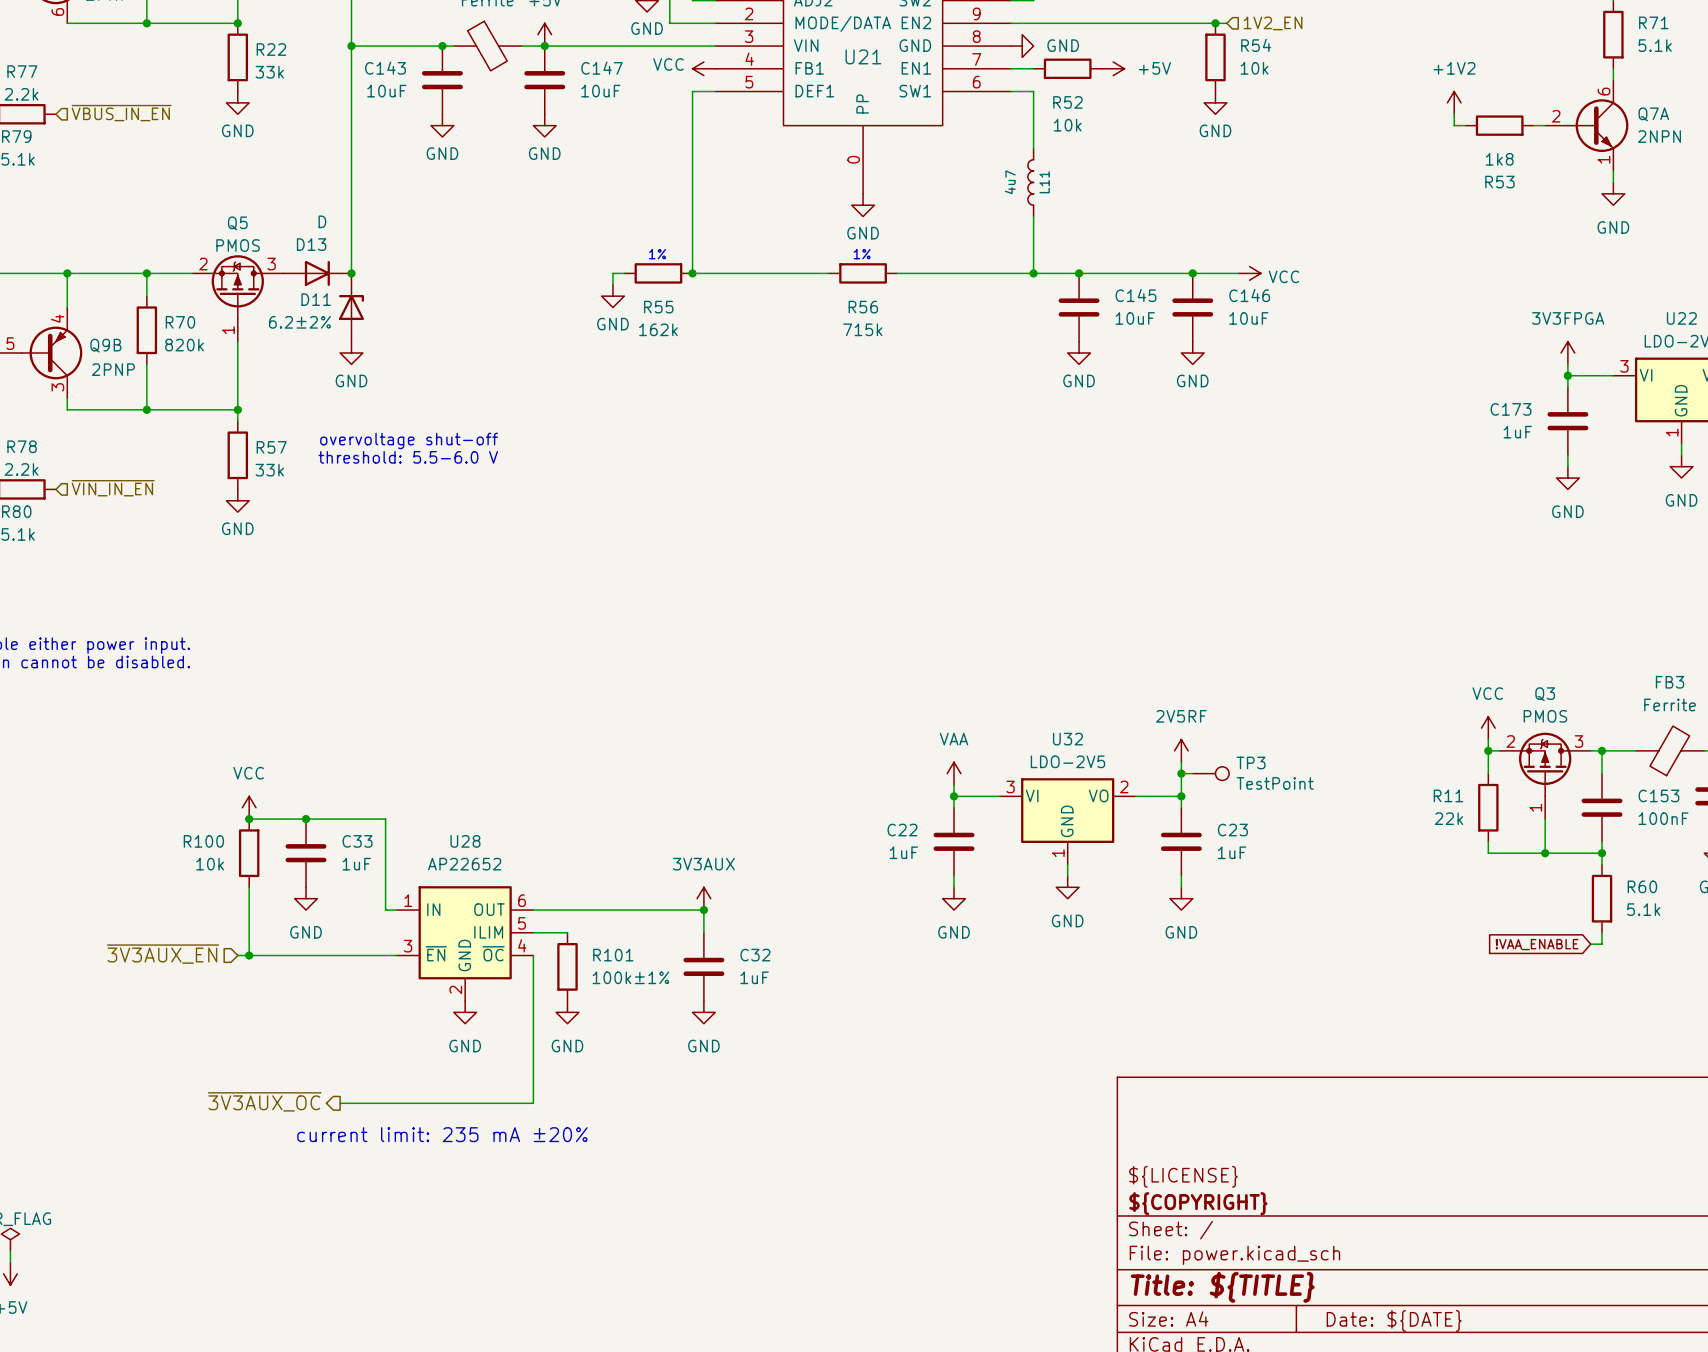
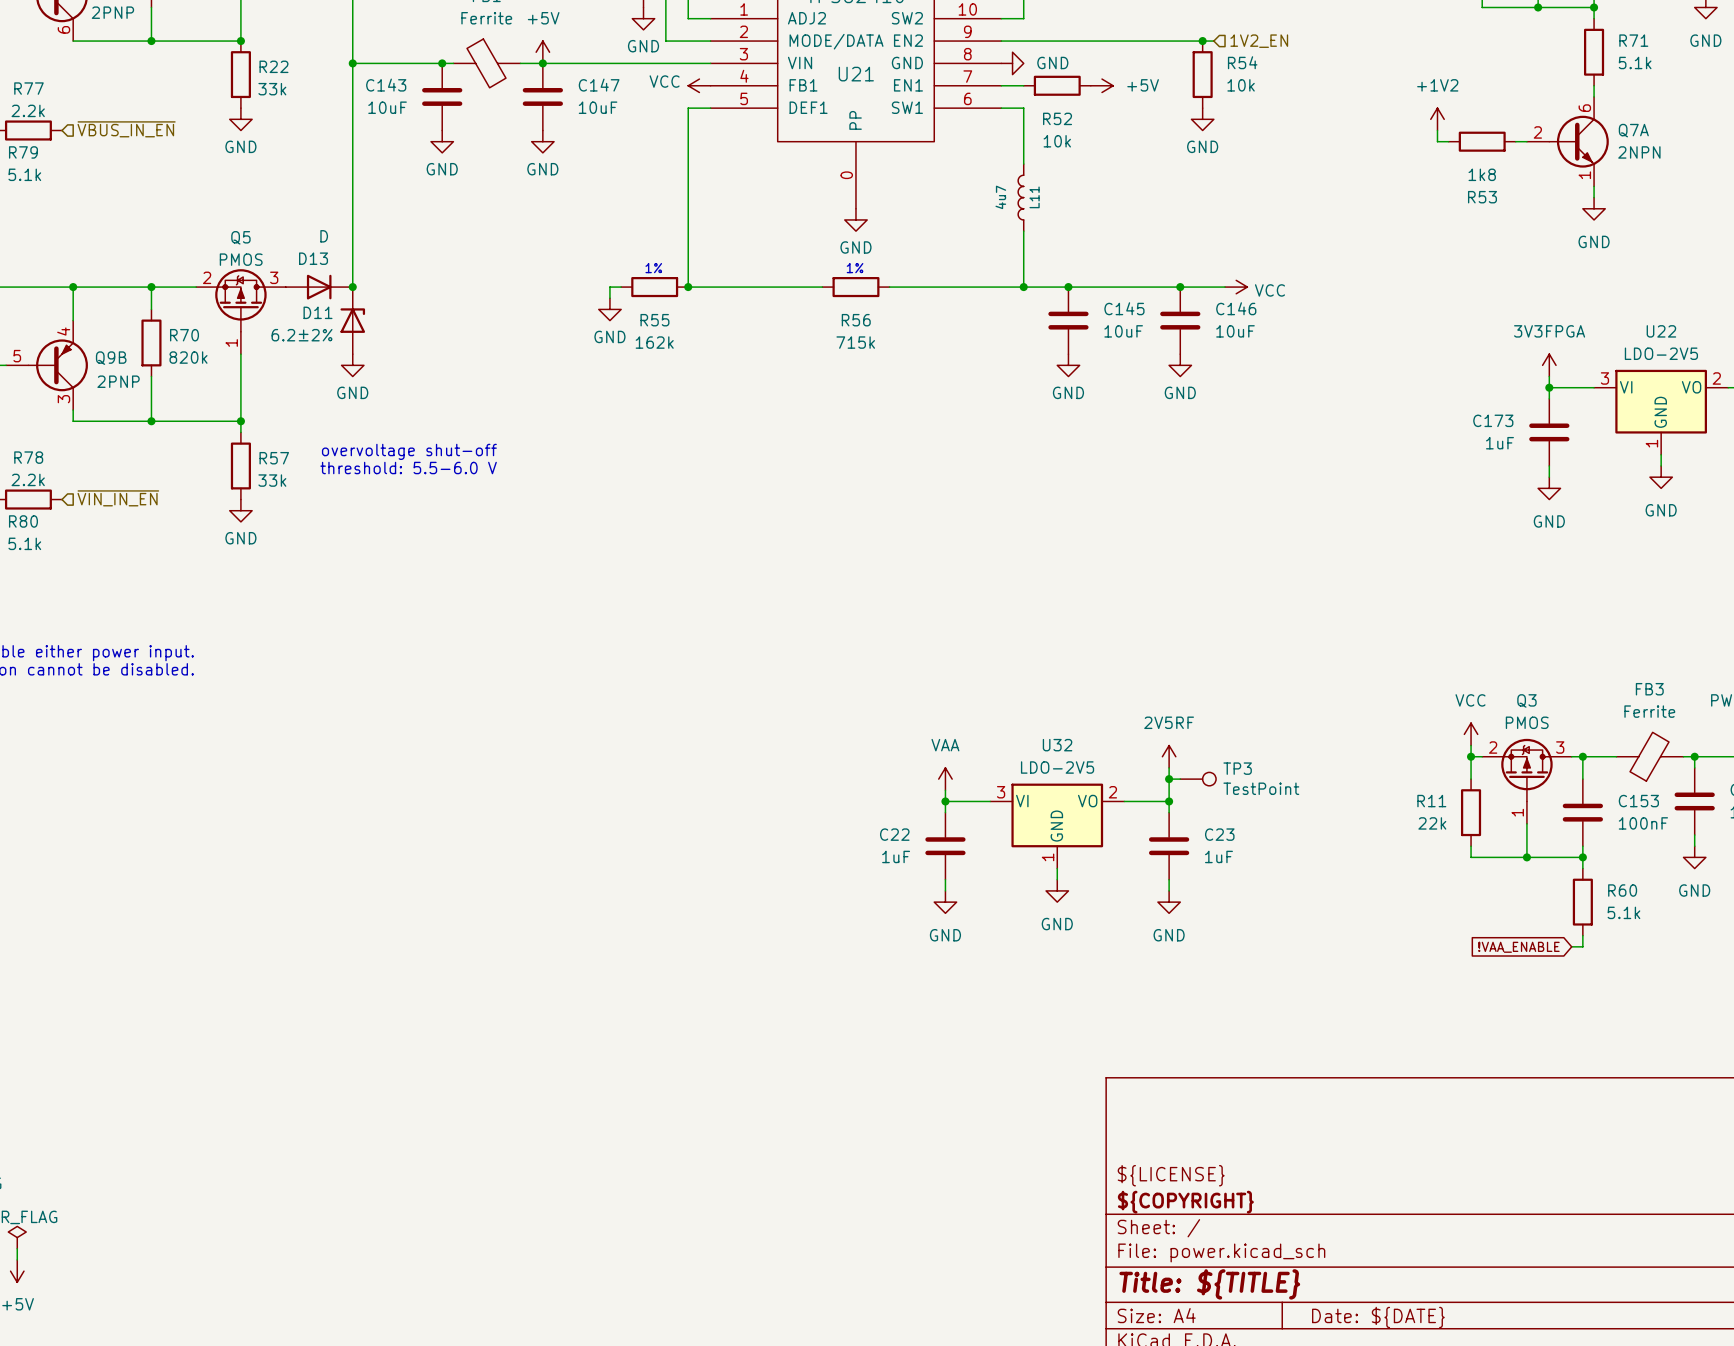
power symbol: VCC (249, 807) -> none
wire: (249, 819) (385, 819) (385, 910) (396, 910) -> none
junction: (249, 819) -> none
junction: (306, 819) -> none
R100: 10k (249, 853) -> none
C33: 1uF (306, 853) -> none
wire: (249, 887) (249, 955) -> none
power symbol: GND (306, 898) -> none
power symbol: 3V3AUX (703, 898) -> none
wire: (533, 910) (703, 910) (703, 932) -> none
junction: (703, 910) -> none
wire: (533, 932) (567, 932) -> none
U28: AP22652 (465, 943) -> none
hierarchical label: ~{3V3AUX_EN} (163, 954) -> none
wire: (237, 955) (396, 955) -> none
junction: (249, 955) -> none
wire: (533, 955) (533, 1103) (340, 1103) -> none
R101: 100k±1% (567, 966) -> none
C32: 1uF (703, 966) -> none
power symbol: GND (465, 1012) -> none
power symbol: GND (567, 1012) -> none
power symbol: GND (703, 1012) -> none
hierarchical label: ~{3V3AUX_OC} (264, 1101) -> none
text: current limit: 235 mA ±20% (442, 1134) -> none

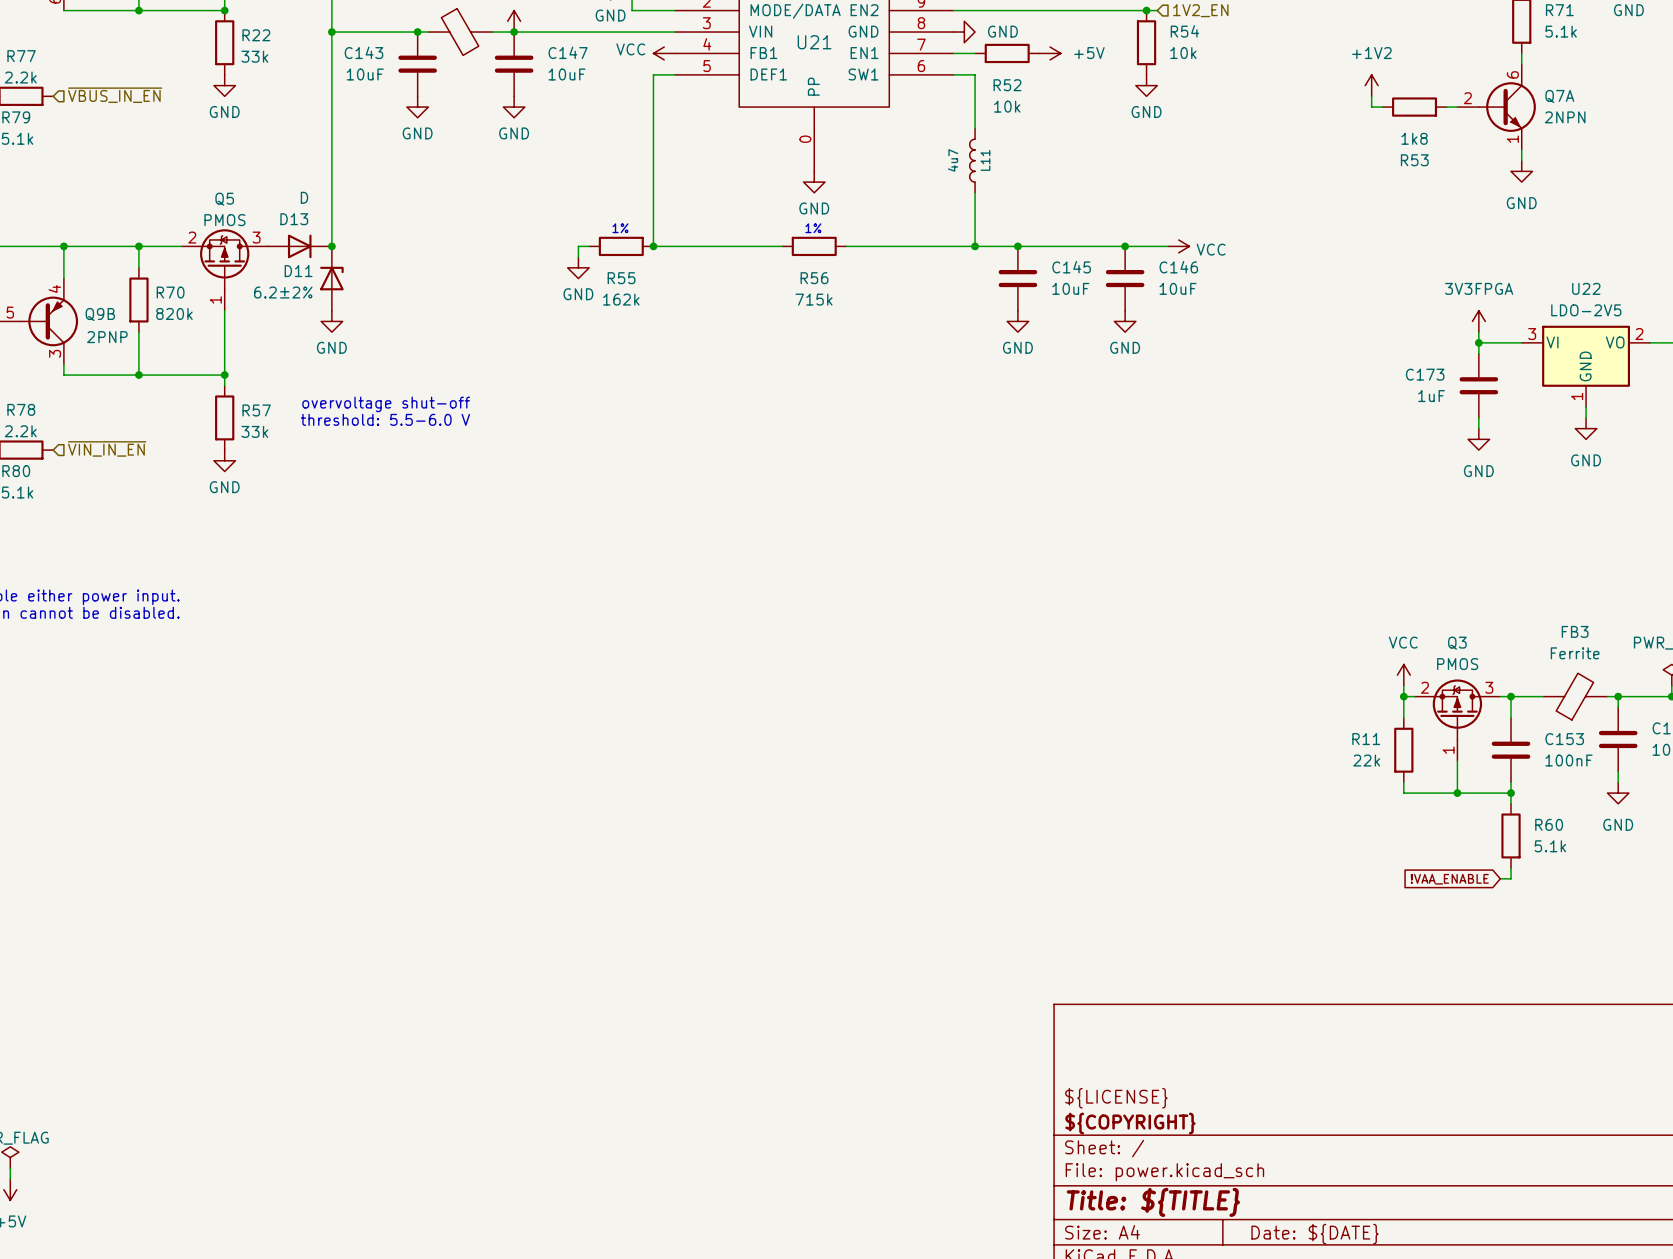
power symbol: 2V5RF (1169, 756) -> none
wire: (1169, 767) (1169, 812) -> none
power symbol: VAA (945, 779) -> none
wire: (1169, 779) (1180, 779) -> none
junction: (1169, 779) -> none
TP3: TestPoint (1198, 779) -> none
wire: (945, 790) (945, 812) -> none
wire: (945, 801) (990, 801) -> none
junction: (945, 801) -> none
wire: (1124, 801) (1169, 801) -> none
junction: (1169, 801) -> none
U32: LDO-2V5 (1057, 826) -> none
C22: 1uF (945, 846) -> none
C23: 1uF (1169, 846) -> none
wire: (1057, 868) (1057, 879) -> none
wire: (945, 879) (945, 890) -> none
wire: (1169, 879) (1169, 890) -> none
power symbol: GND (1057, 890) -> none
power symbol: GND (945, 902) -> none
power symbol: GND (1169, 902) -> none

